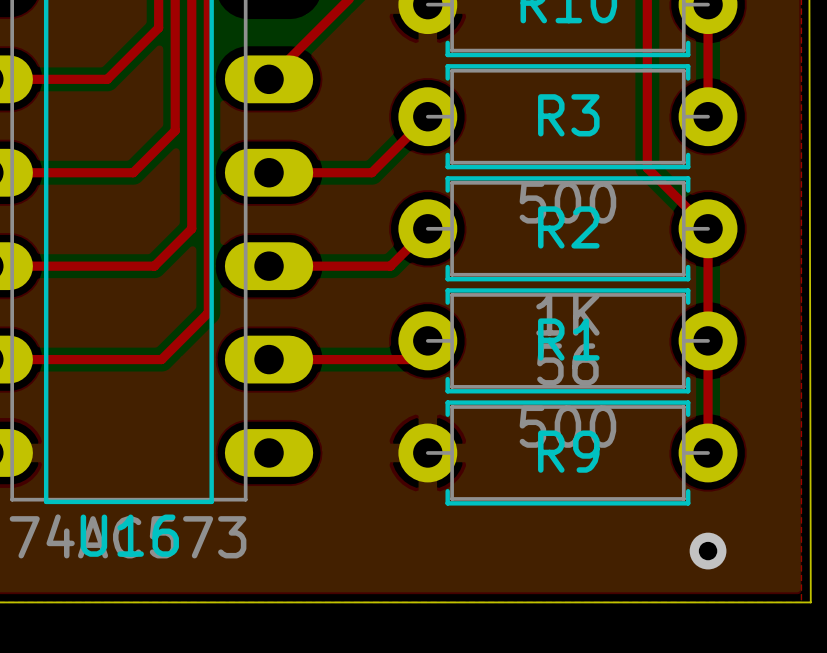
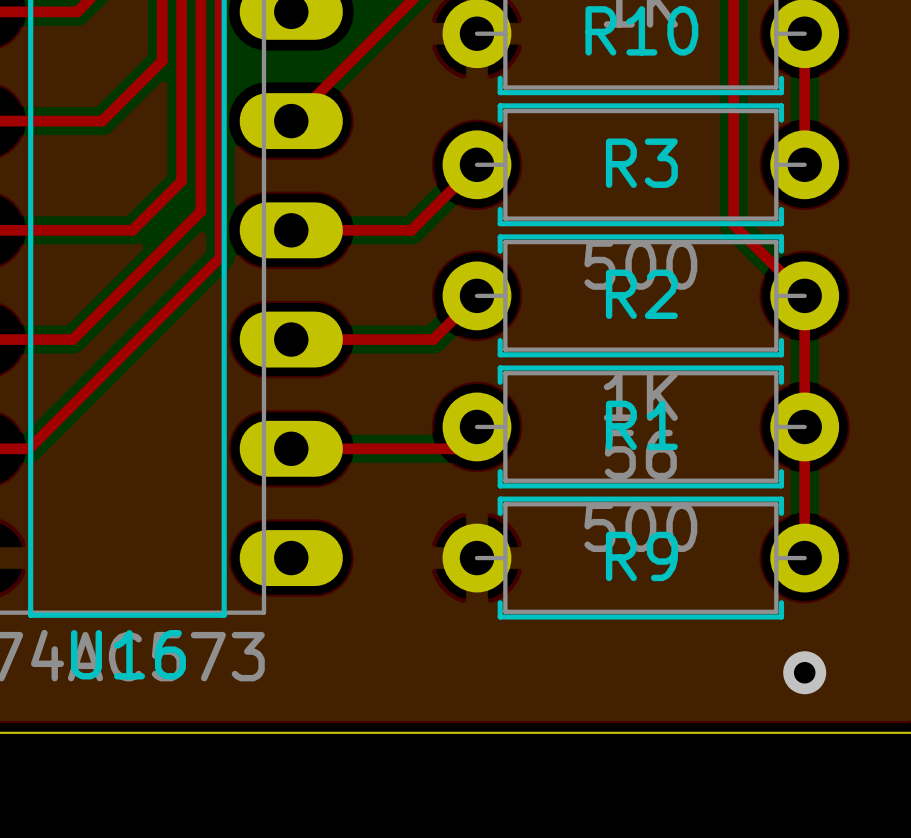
top track: (191, 156) (191, 228) (154, 266) (82, 266) -> (200, 211) (72, 339)
top track: (208, 196) (208, 312) (161, 359) (44, 359) -> (220, 257) (29, 448)

